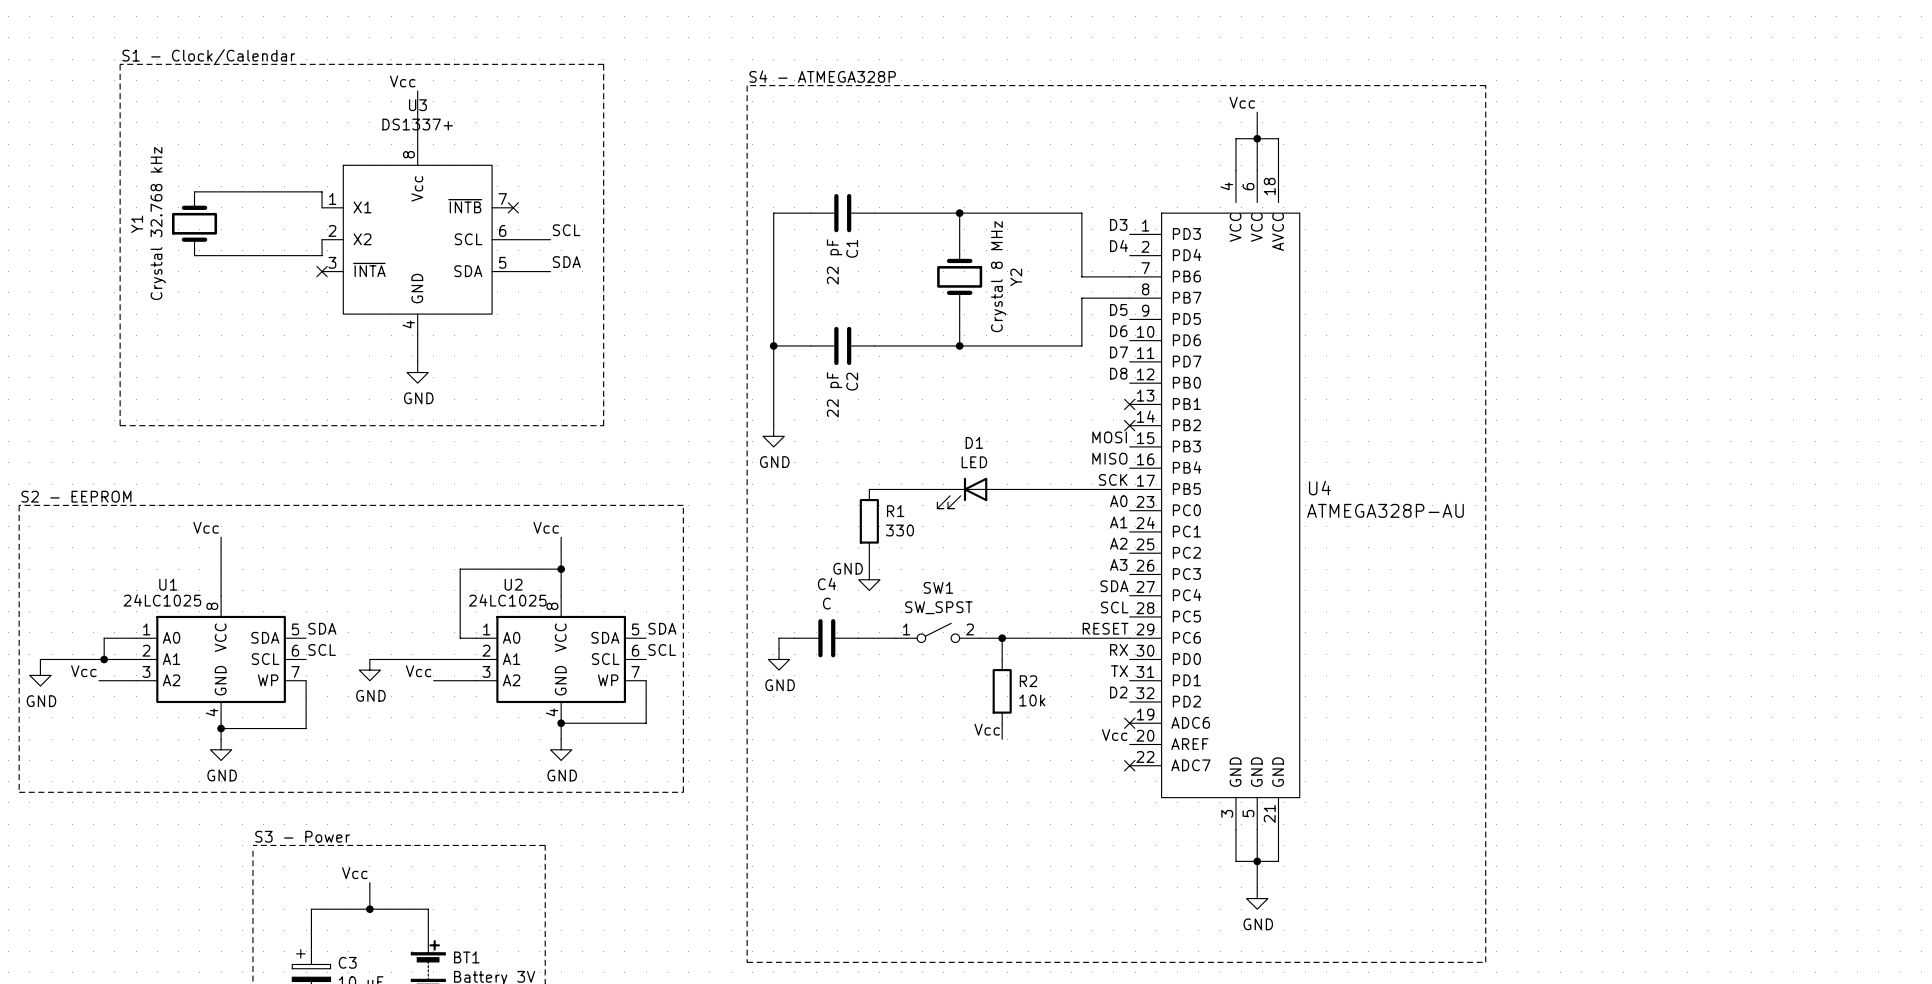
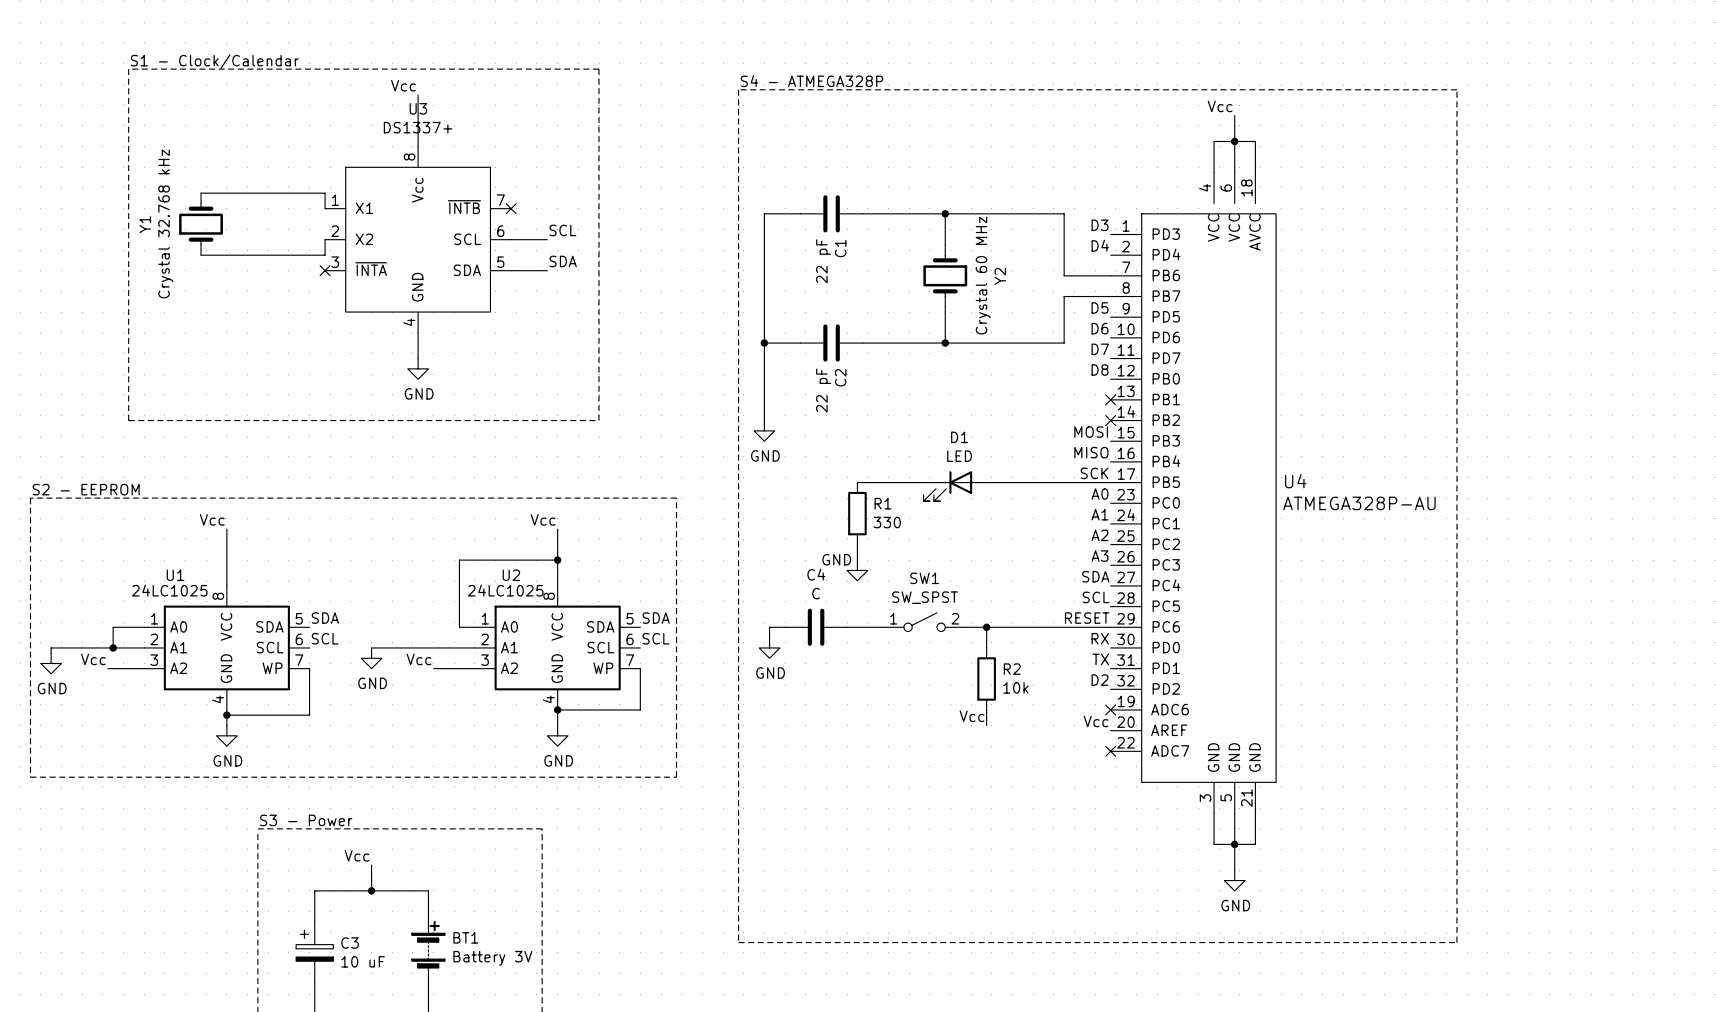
Y2 value: Crystal 8 MHz (998, 276) -> Crystal 60 MHz (983, 275)

